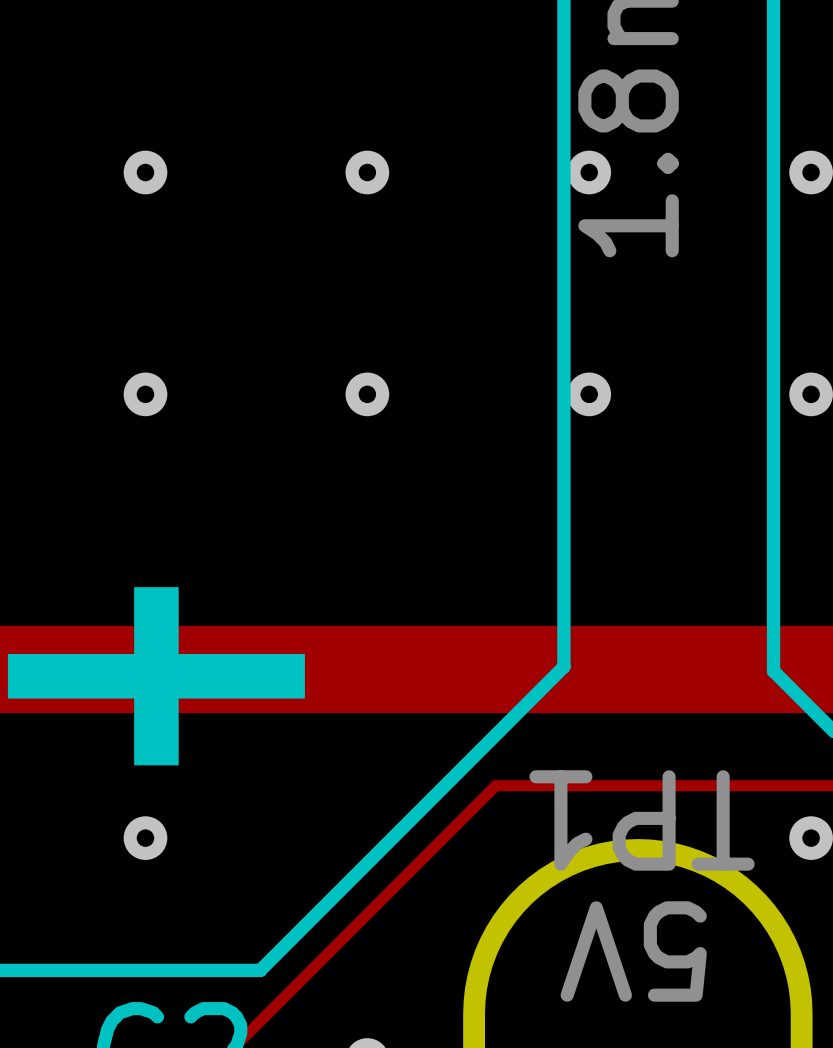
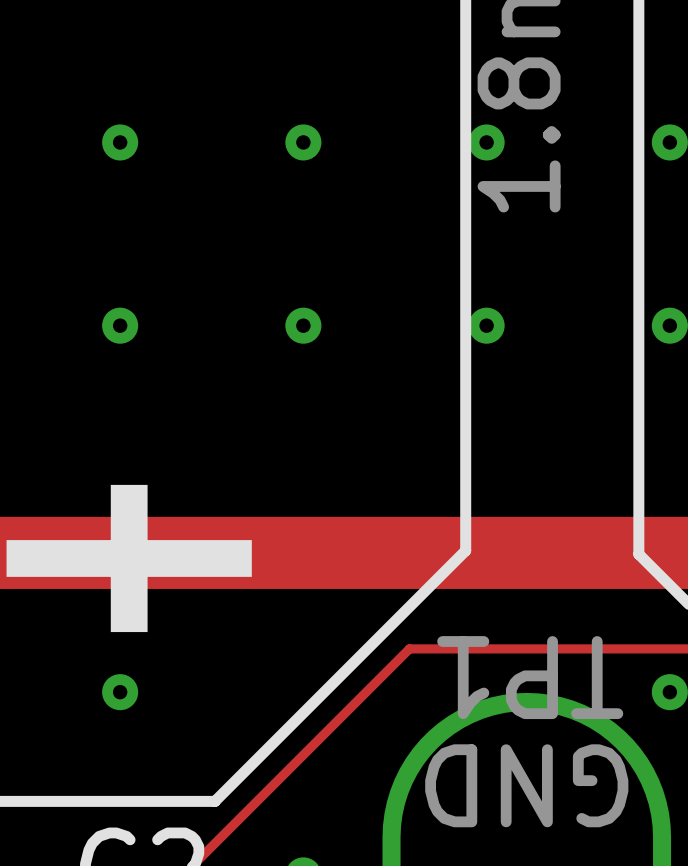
TP1 value: 5V (633, 951) -> GND (526, 785)

